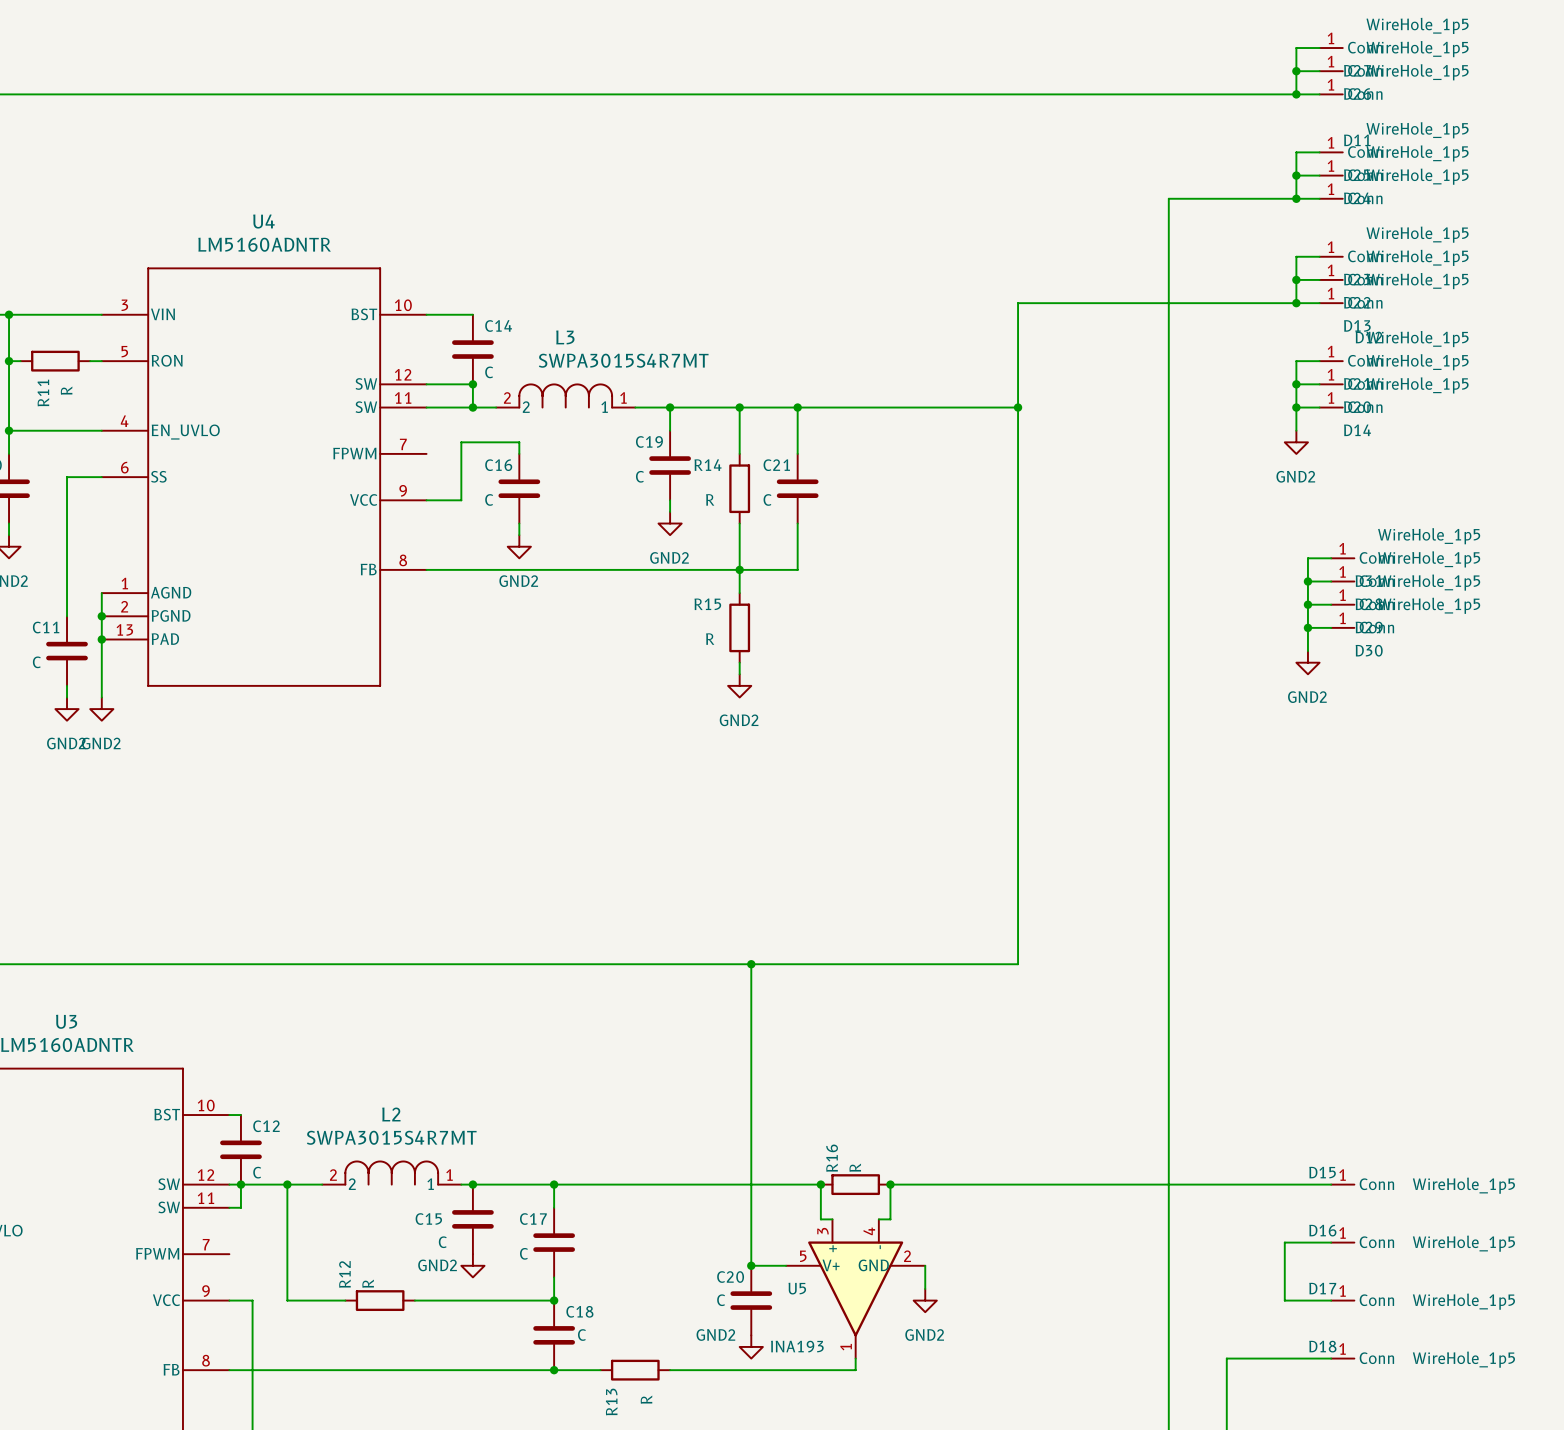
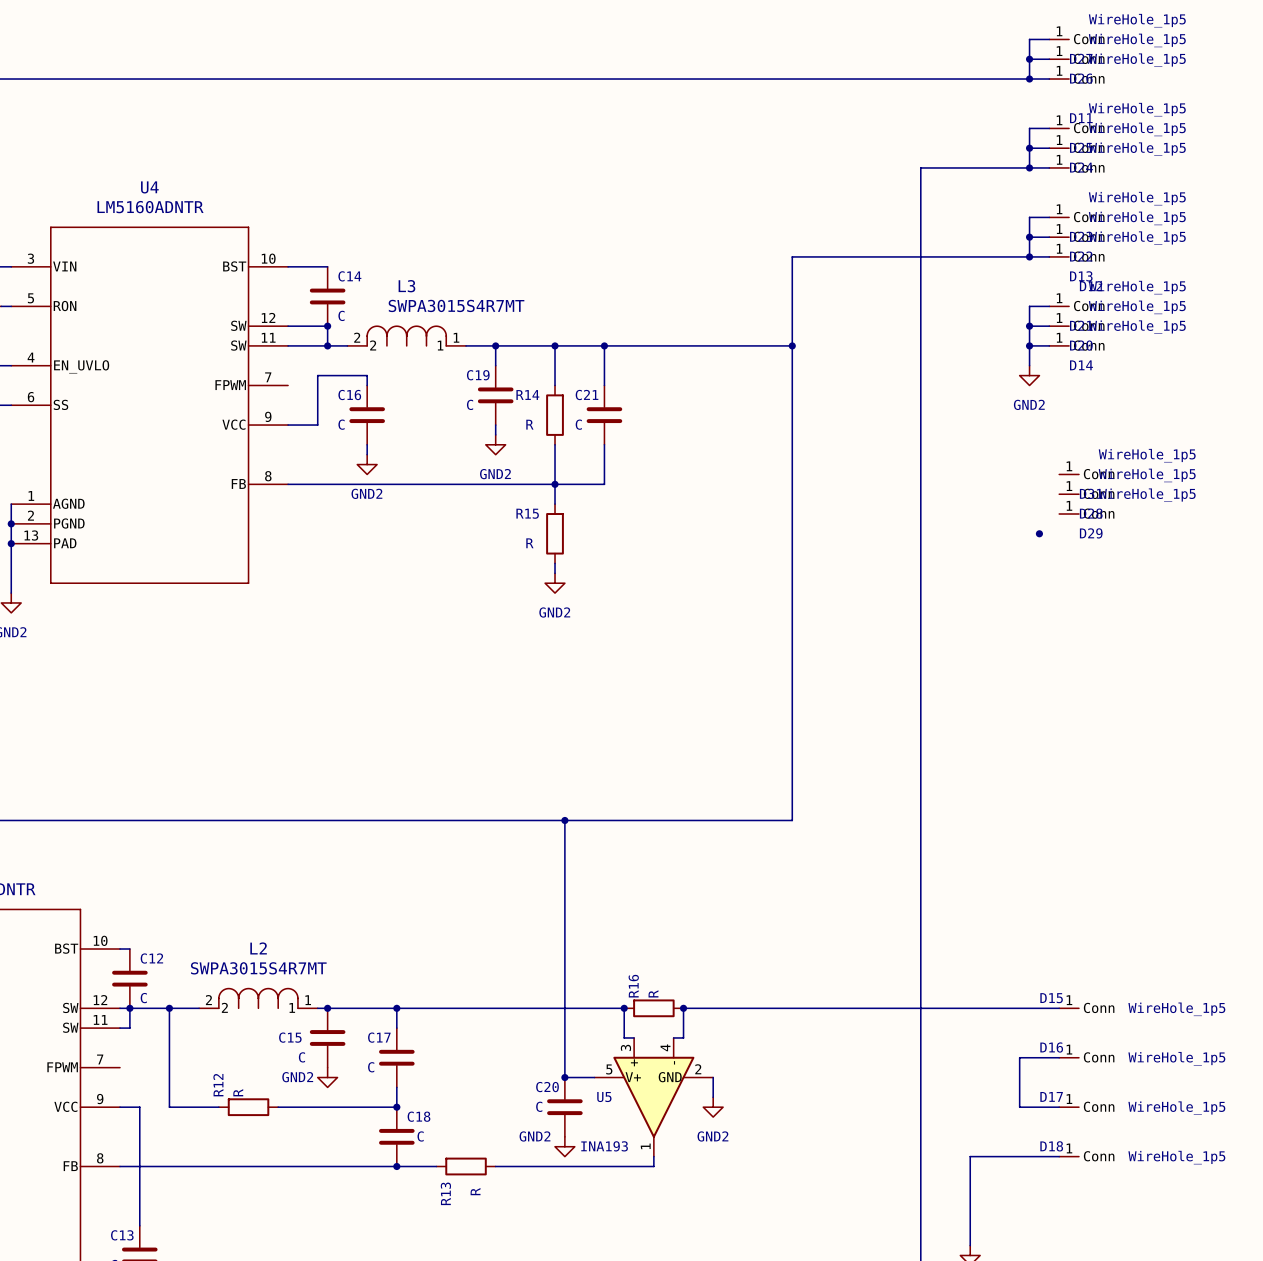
wire: (1331, 558) (1307, 558) (1307, 651) -> none
wire: (1307, 581) (1331, 581) -> none
junction: (1307, 581) -> none
wire: (1307, 604) (1331, 604) -> none
junction: (1307, 604) -> none
wire: (1307, 627) (1331, 627) -> none
D30: WireHole_1p5 (1342, 627) -> none
power symbol: GND2 (1307, 662) -> none

